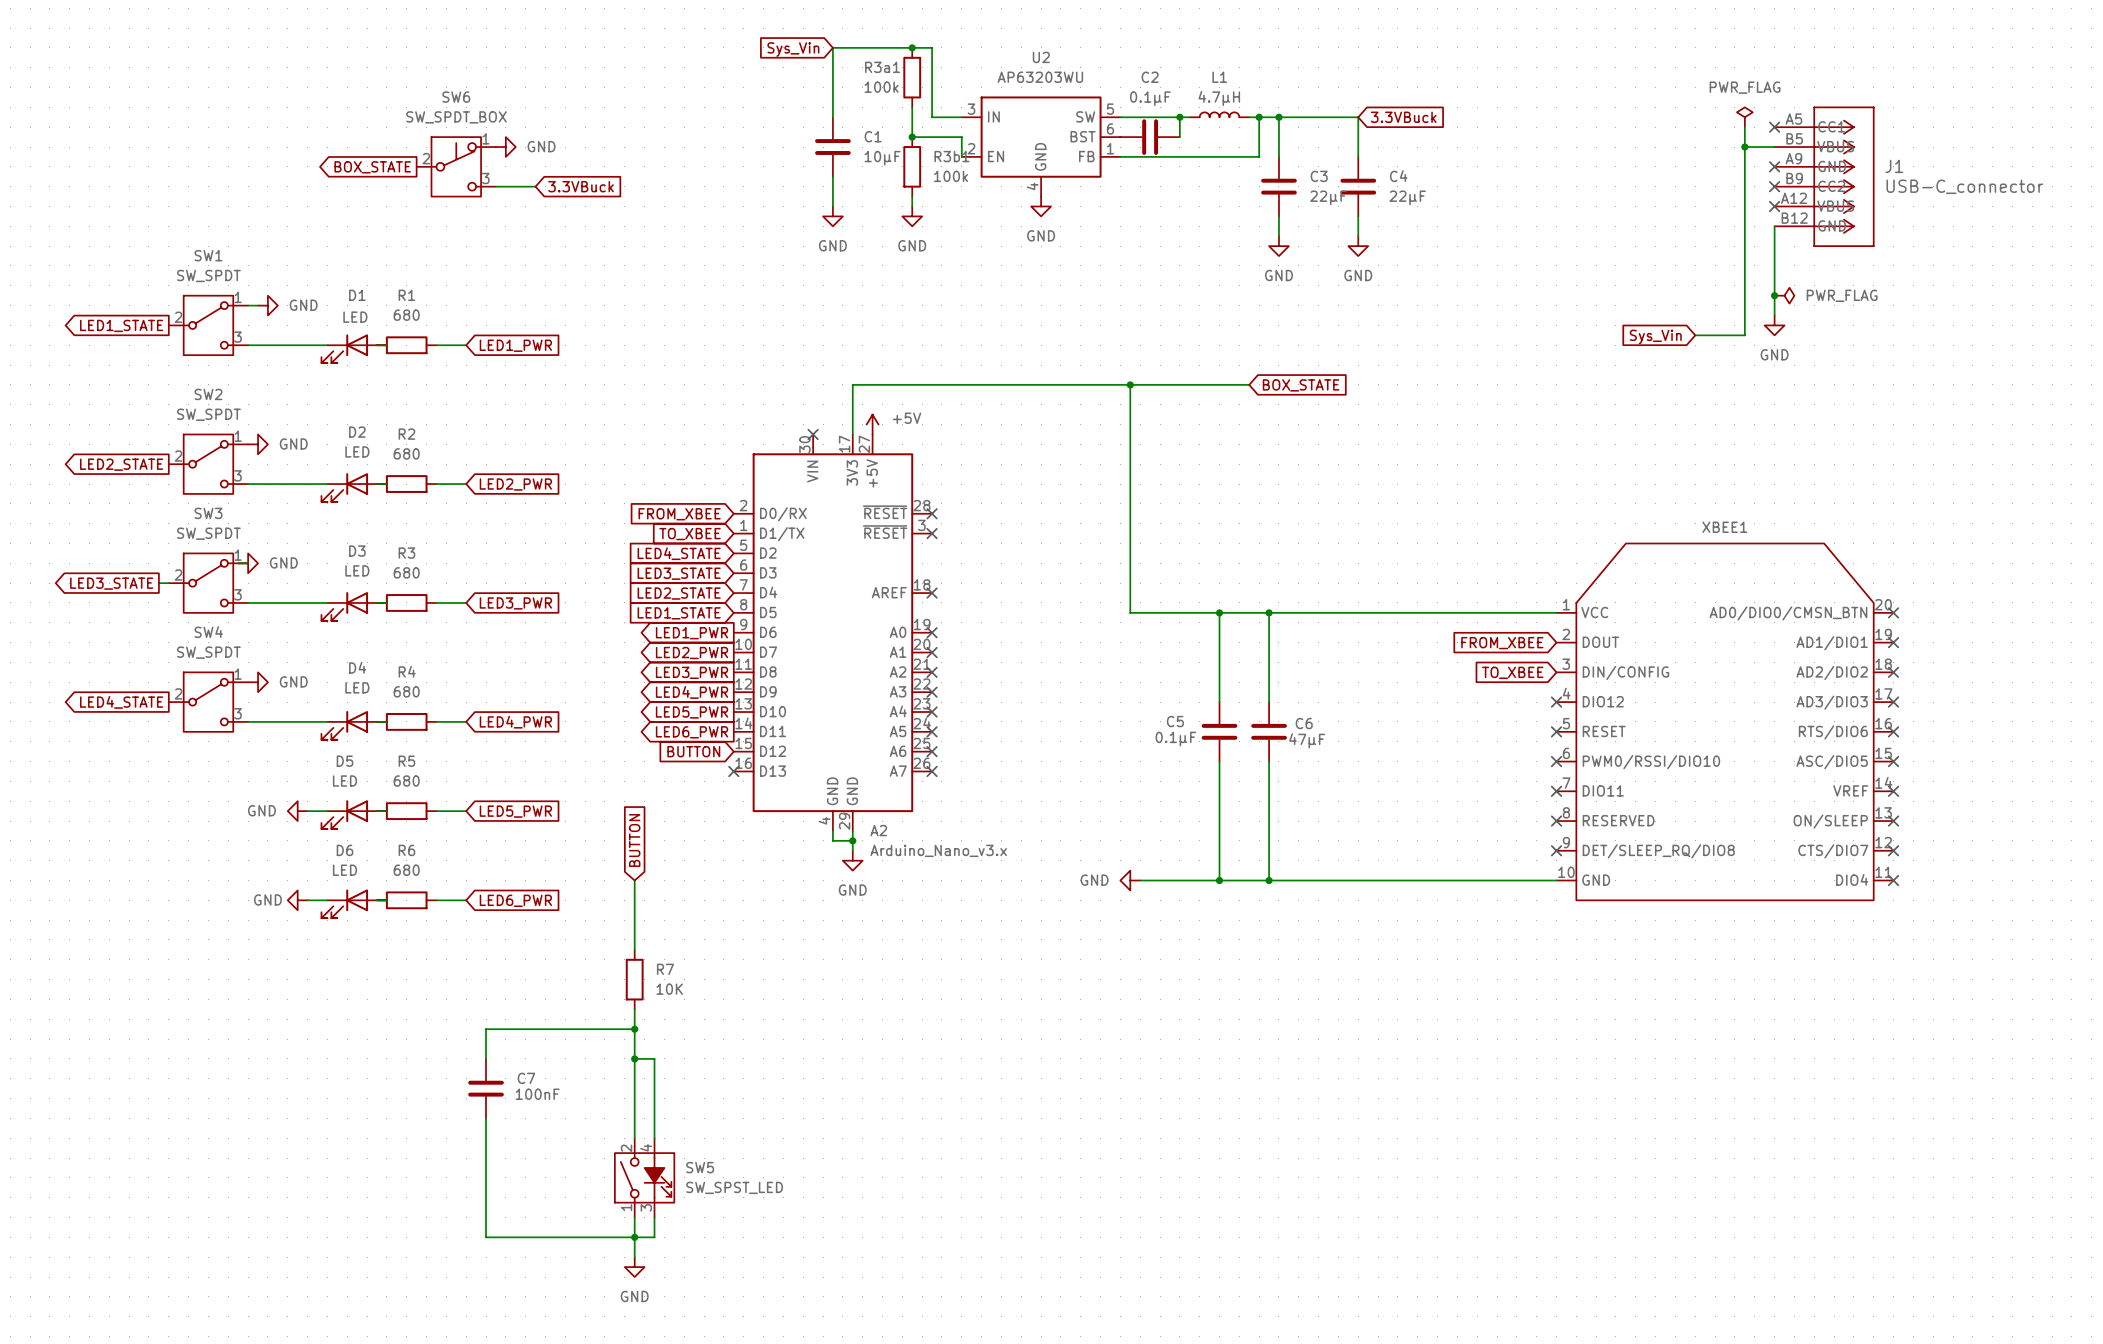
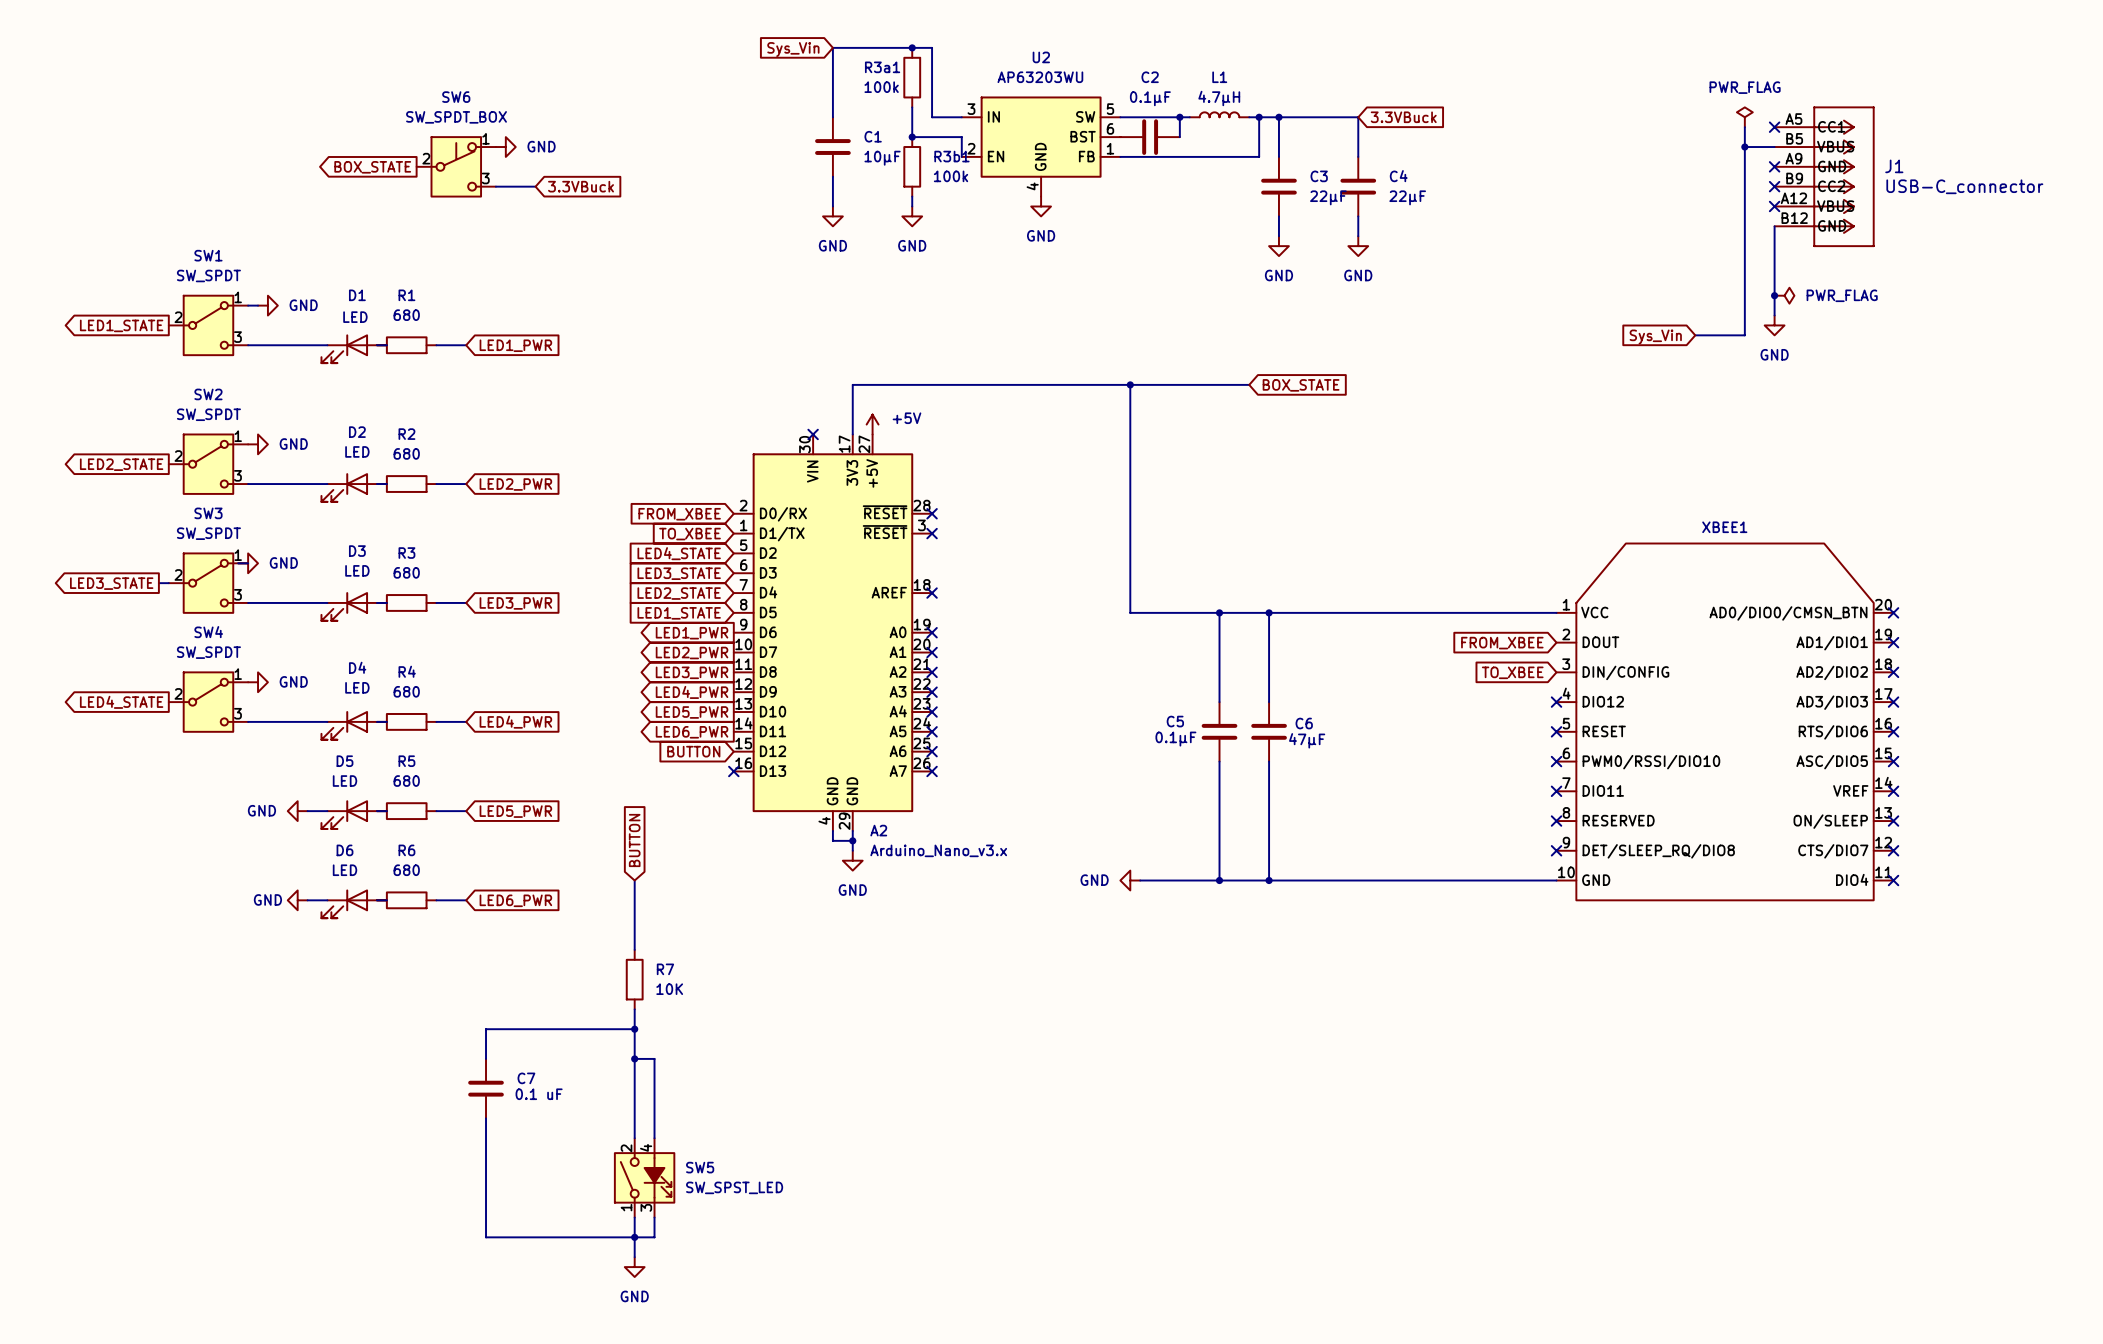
C7 value: 100nF (537, 1094) -> 0.1 uF (539, 1094)

